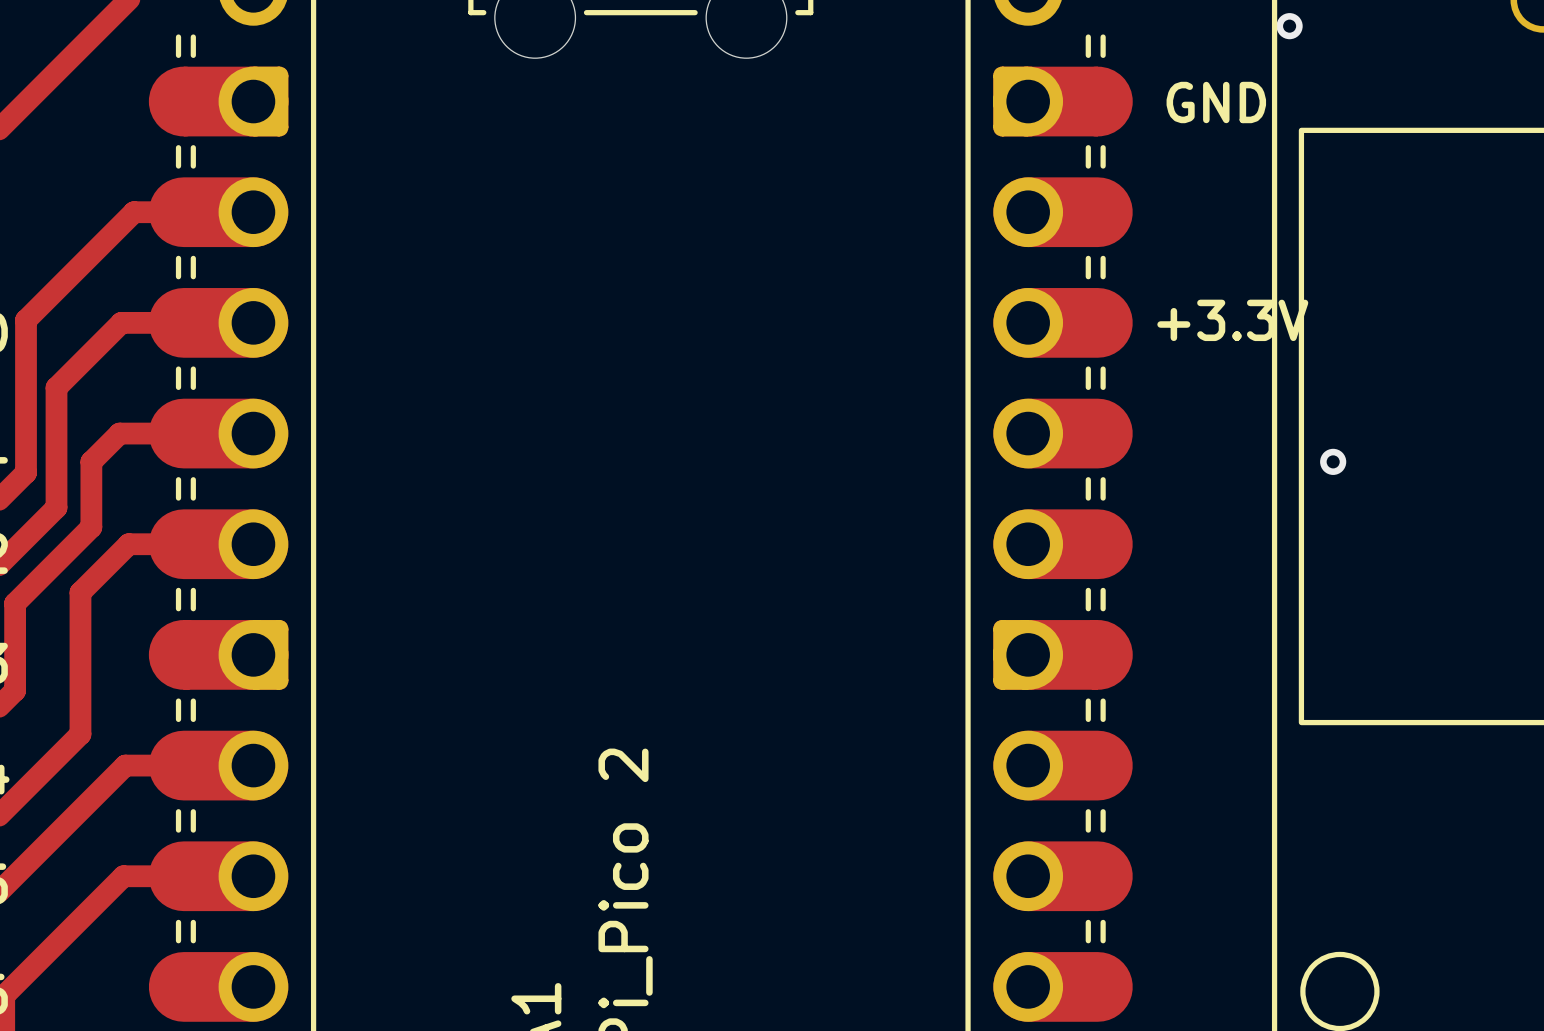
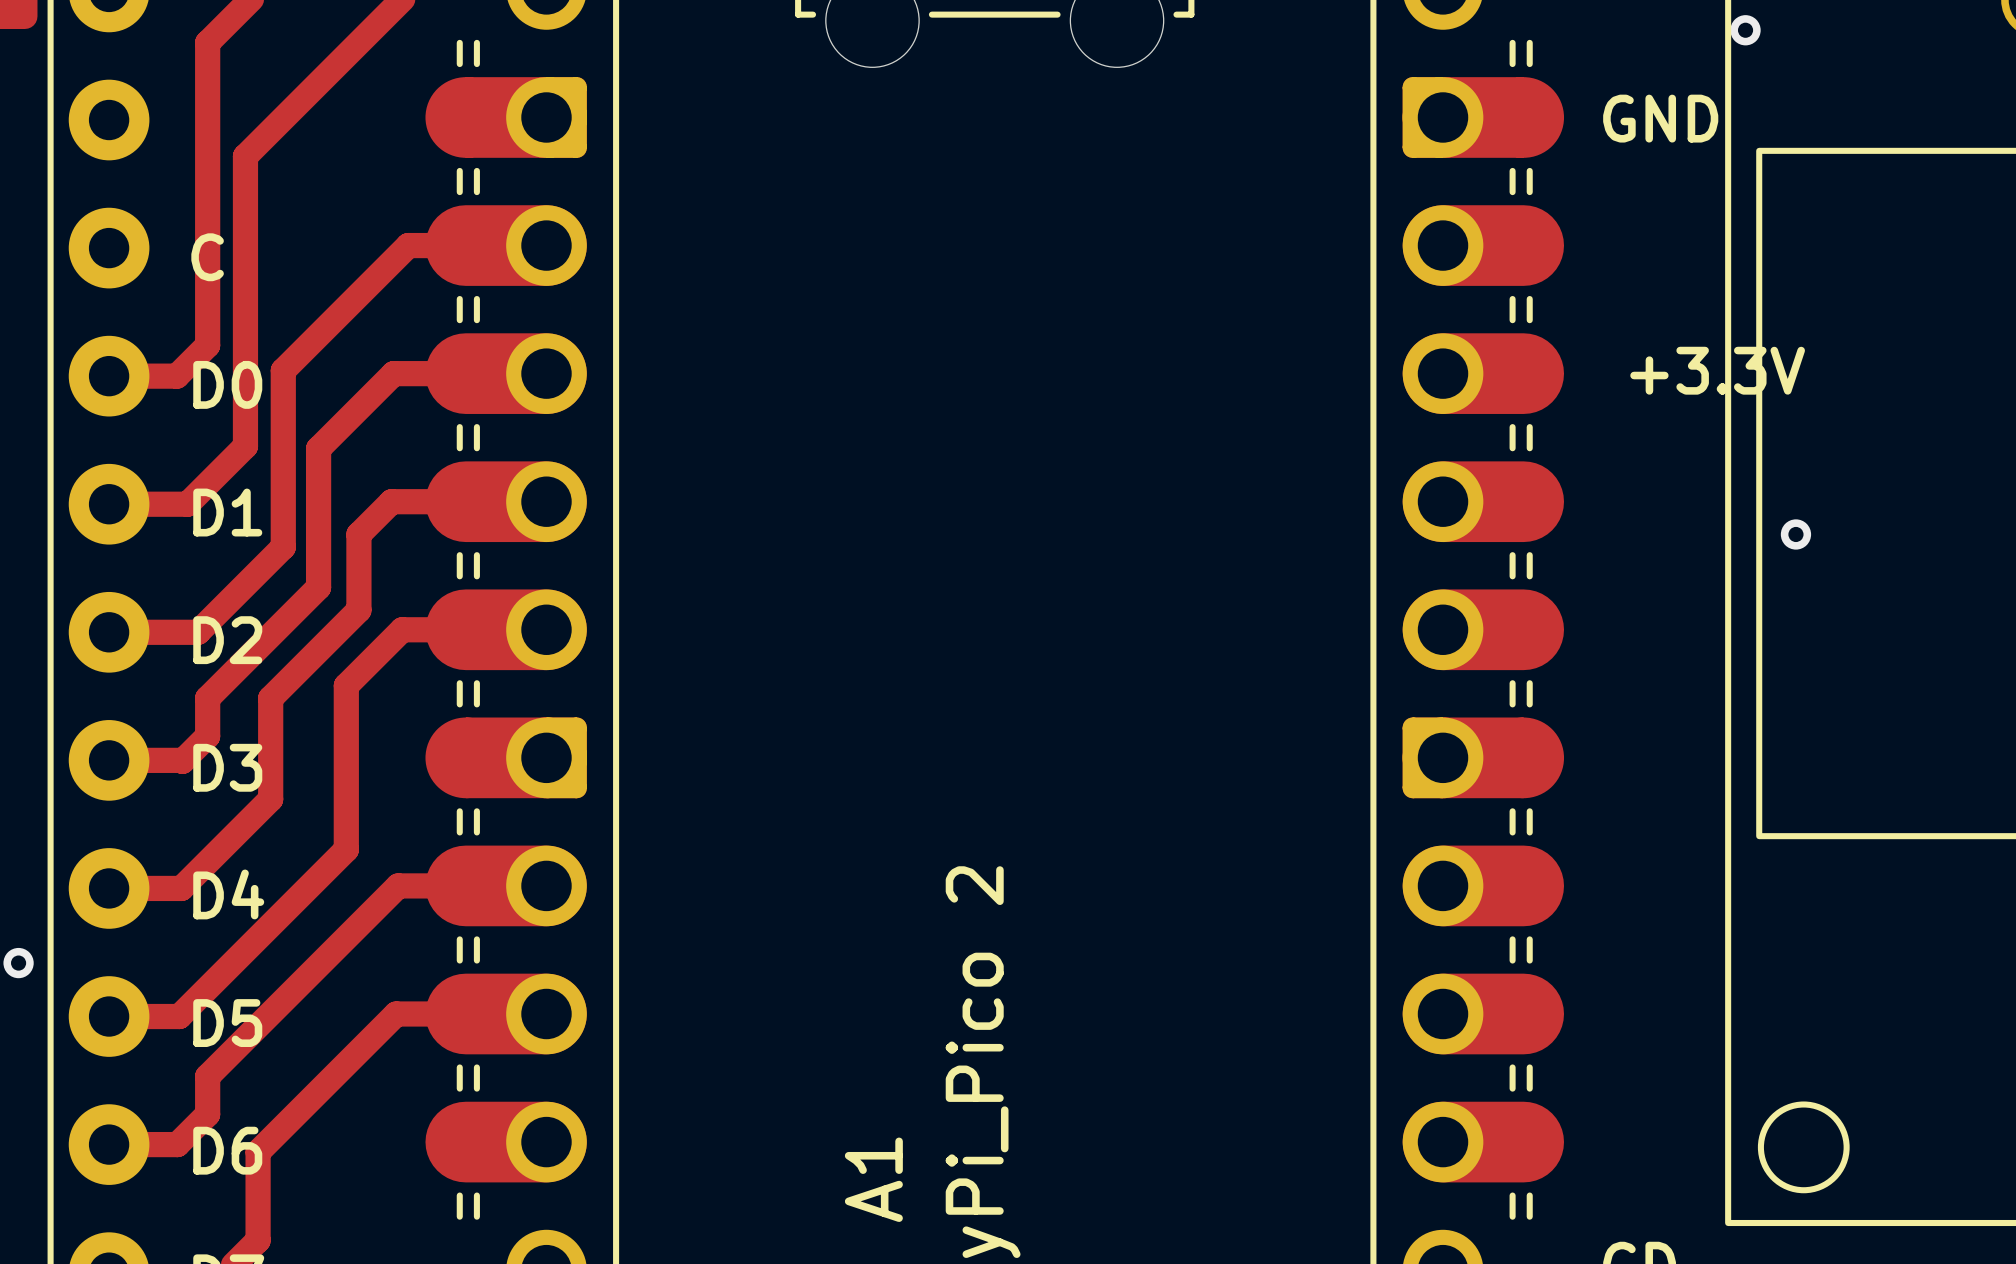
text position: +3.3V (1232, 320) -> +3.3V (1717, 370)

